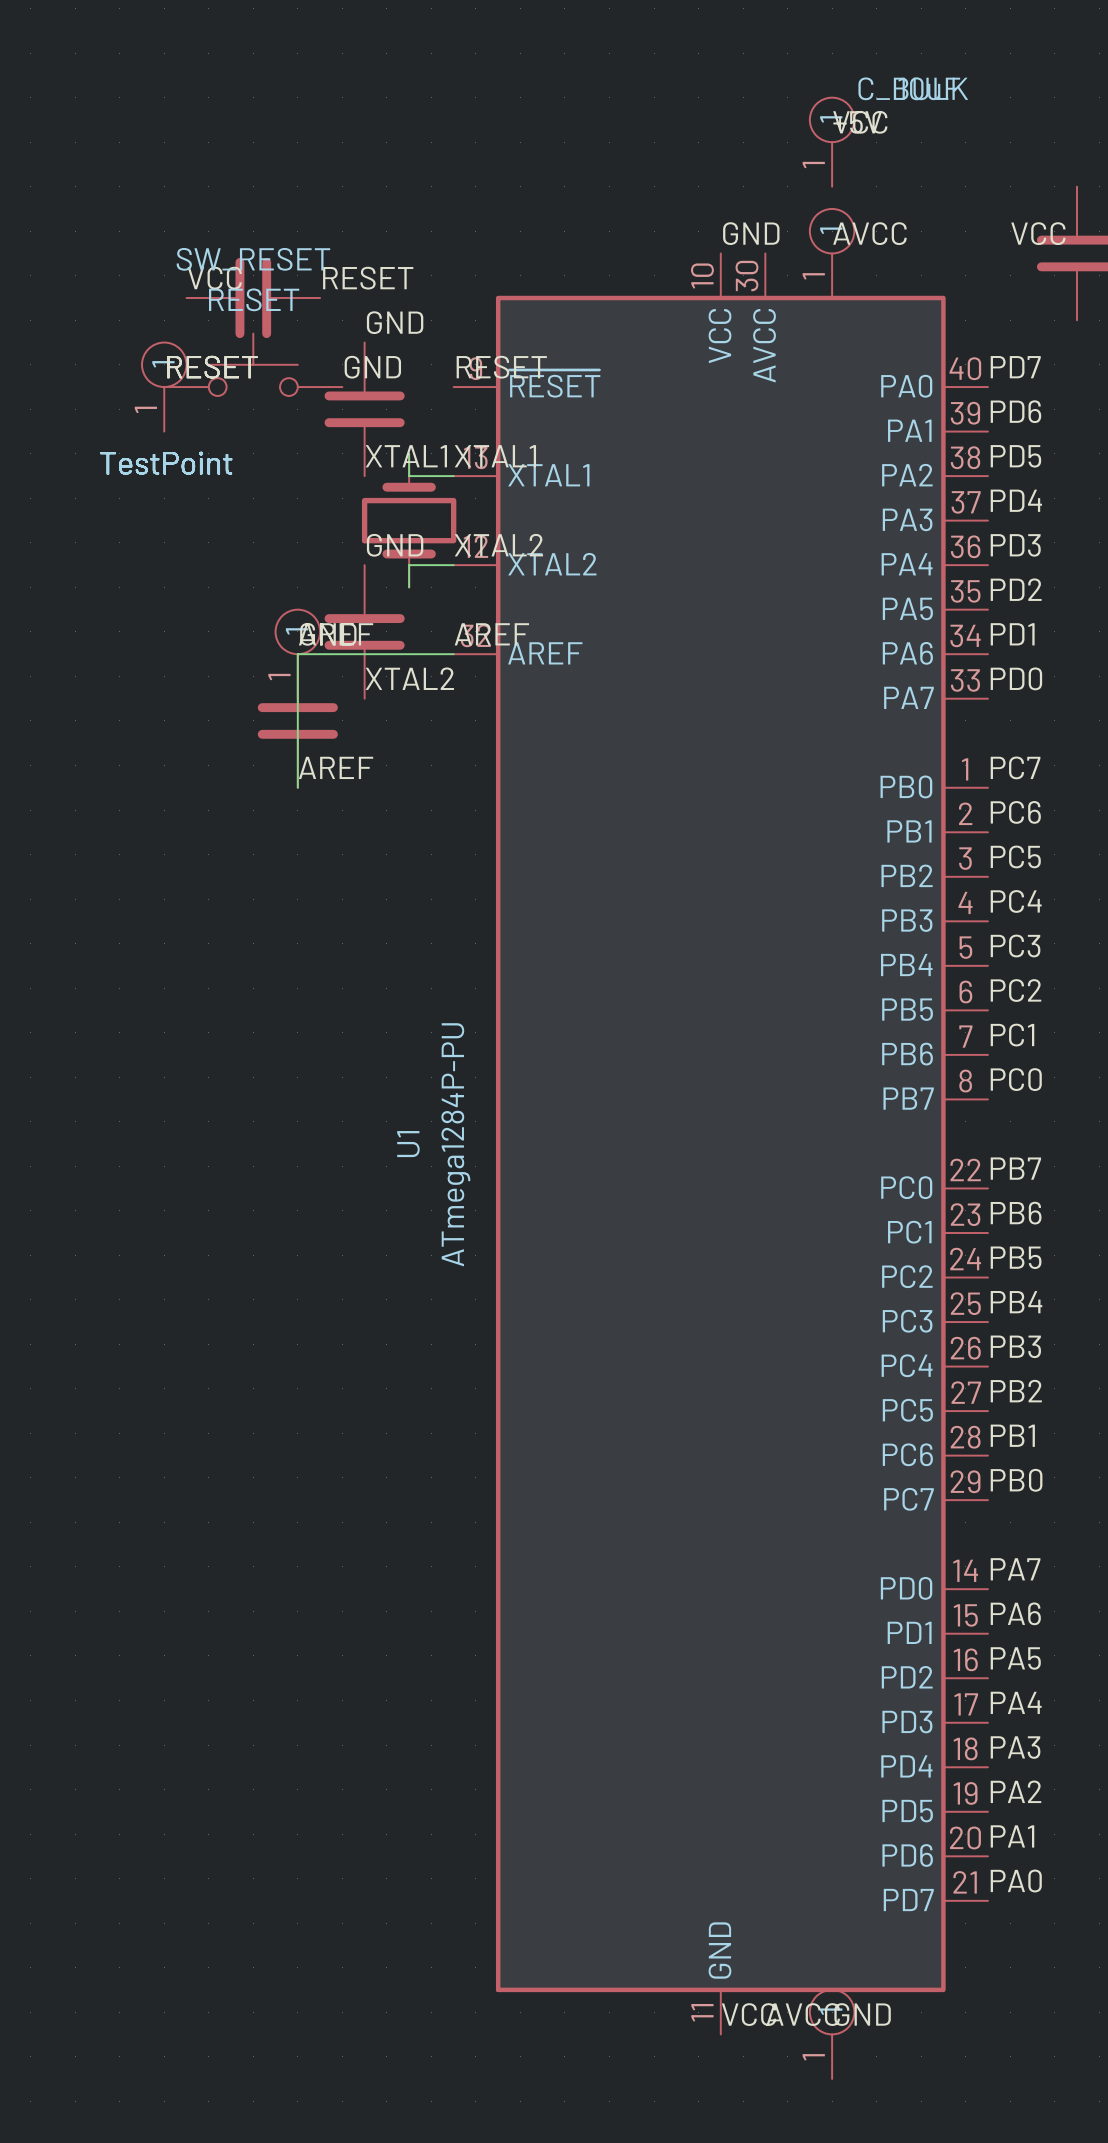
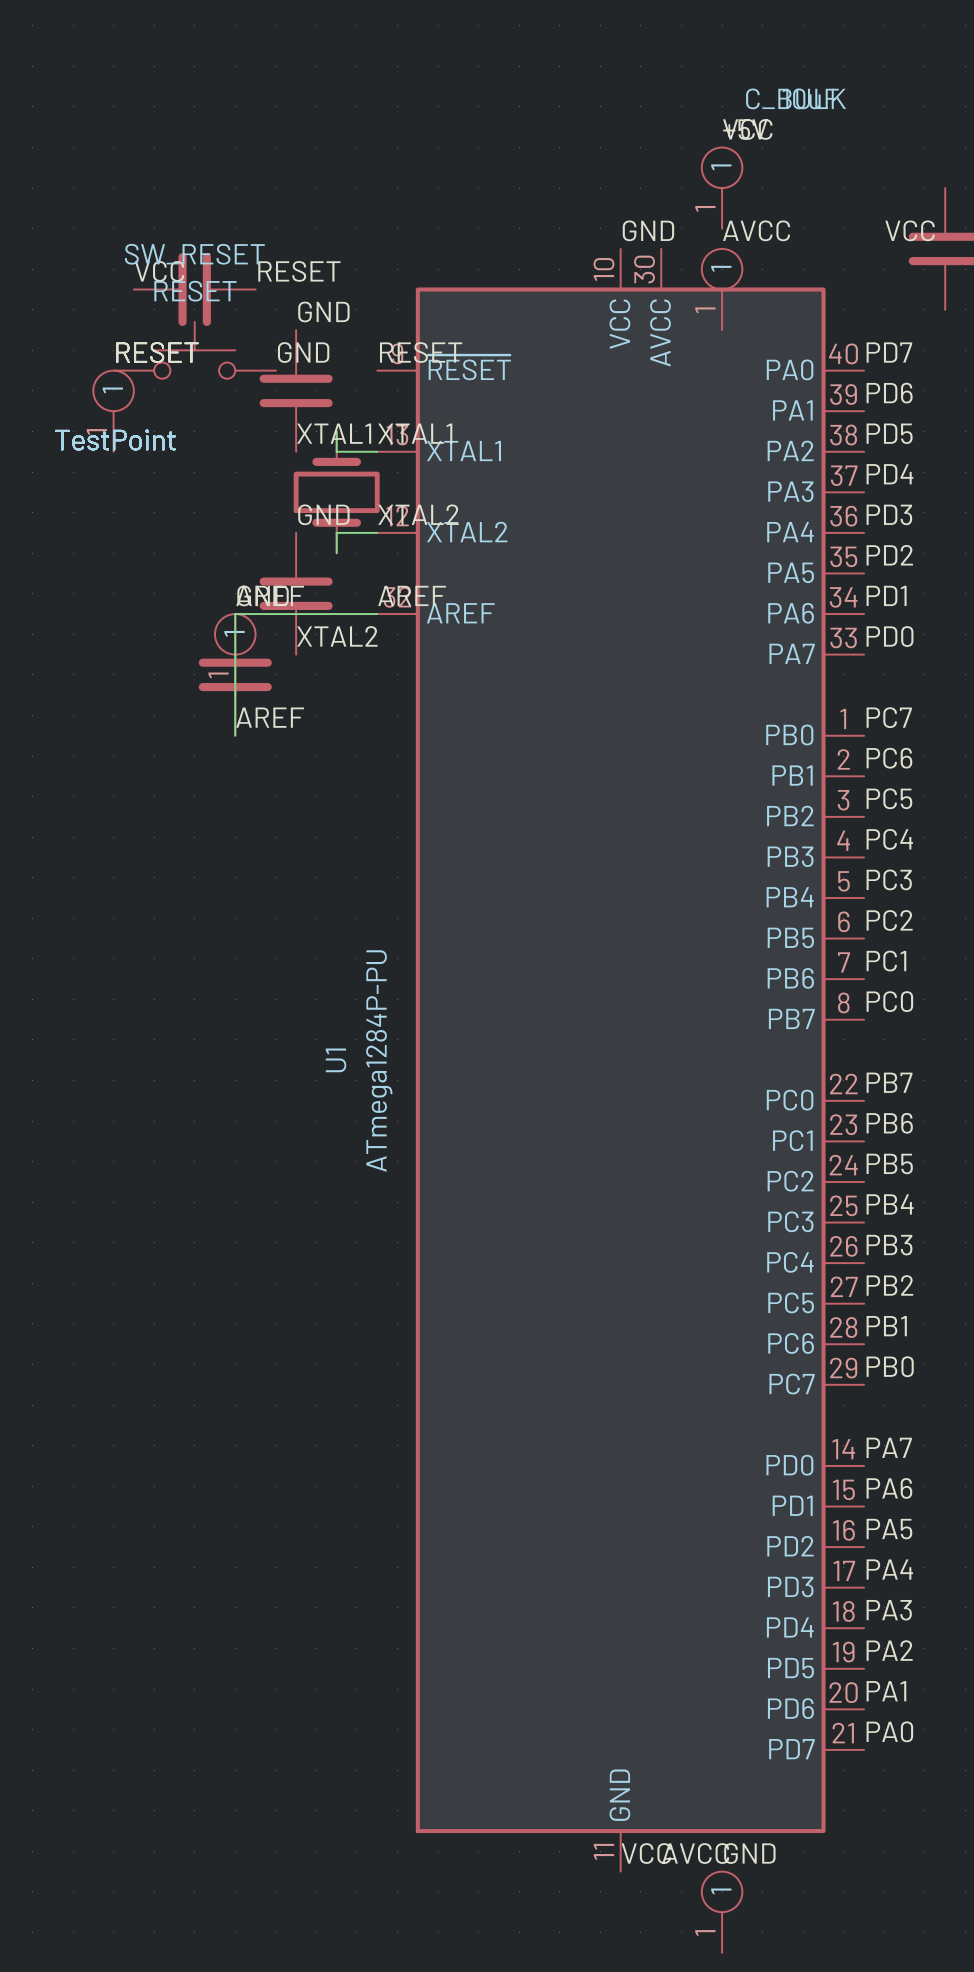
part: TestPoint (832, 142) -> none
part: none -> TestPoint (722, 188)
part: TestPoint (832, 253) -> none
part: none -> TestPoint (722, 289)
part position: (164, 387) -> (113, 411)
part position: (297, 654) -> (235, 654)
part position: (832, 2034) -> (722, 1912)

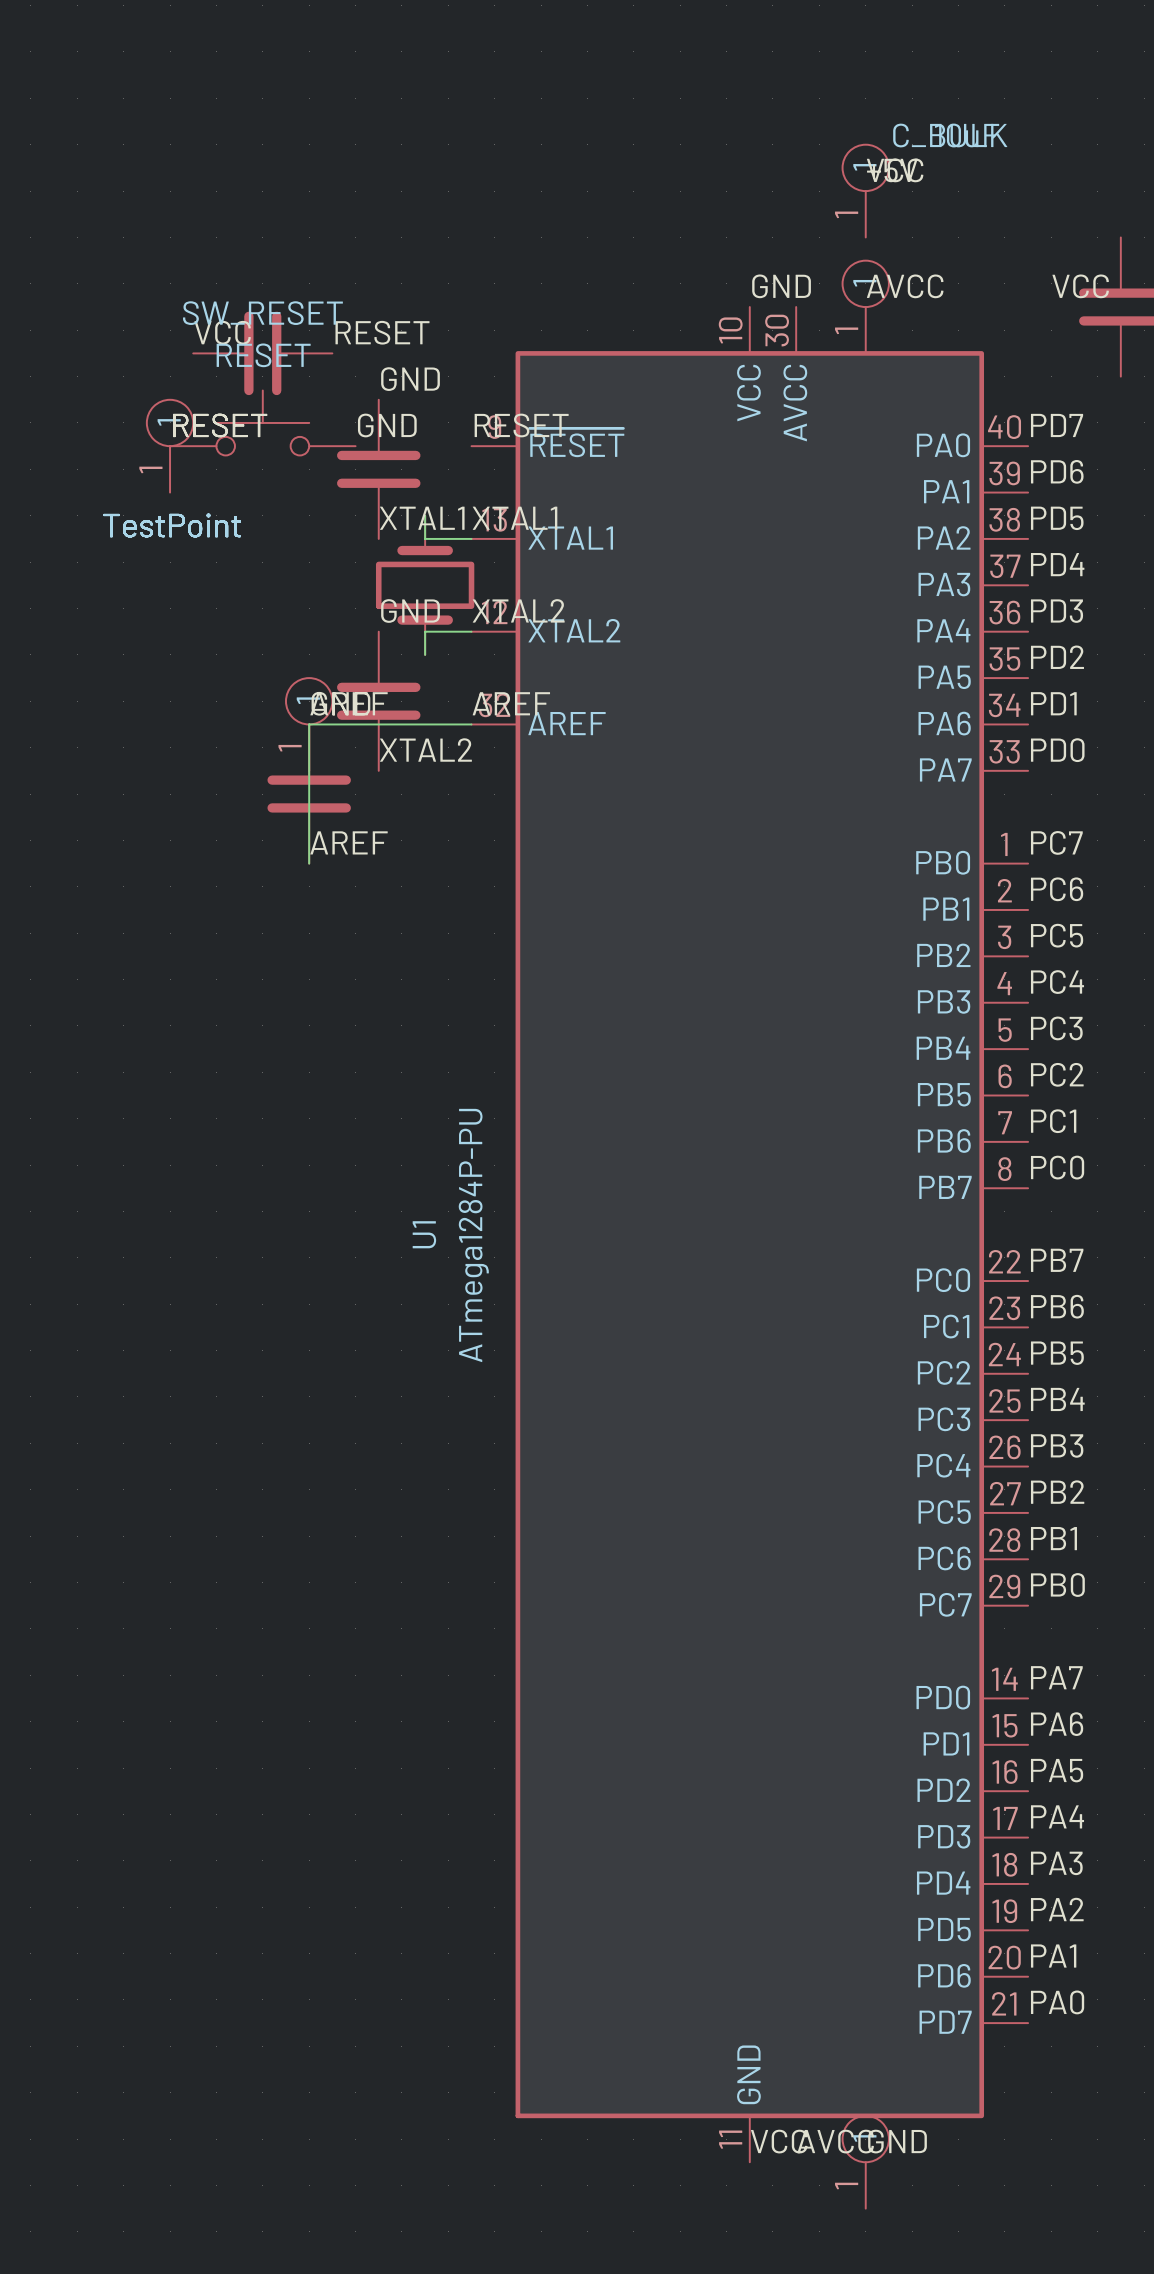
part: none -> TestPoint (865, 191)
part: TestPoint (722, 188) -> none
part: none -> TestPoint (865, 307)
part: TestPoint (722, 289) -> none
part position: (113, 411) -> (170, 446)
part position: (235, 654) -> (309, 724)
part position: (722, 1912) -> (865, 2162)

